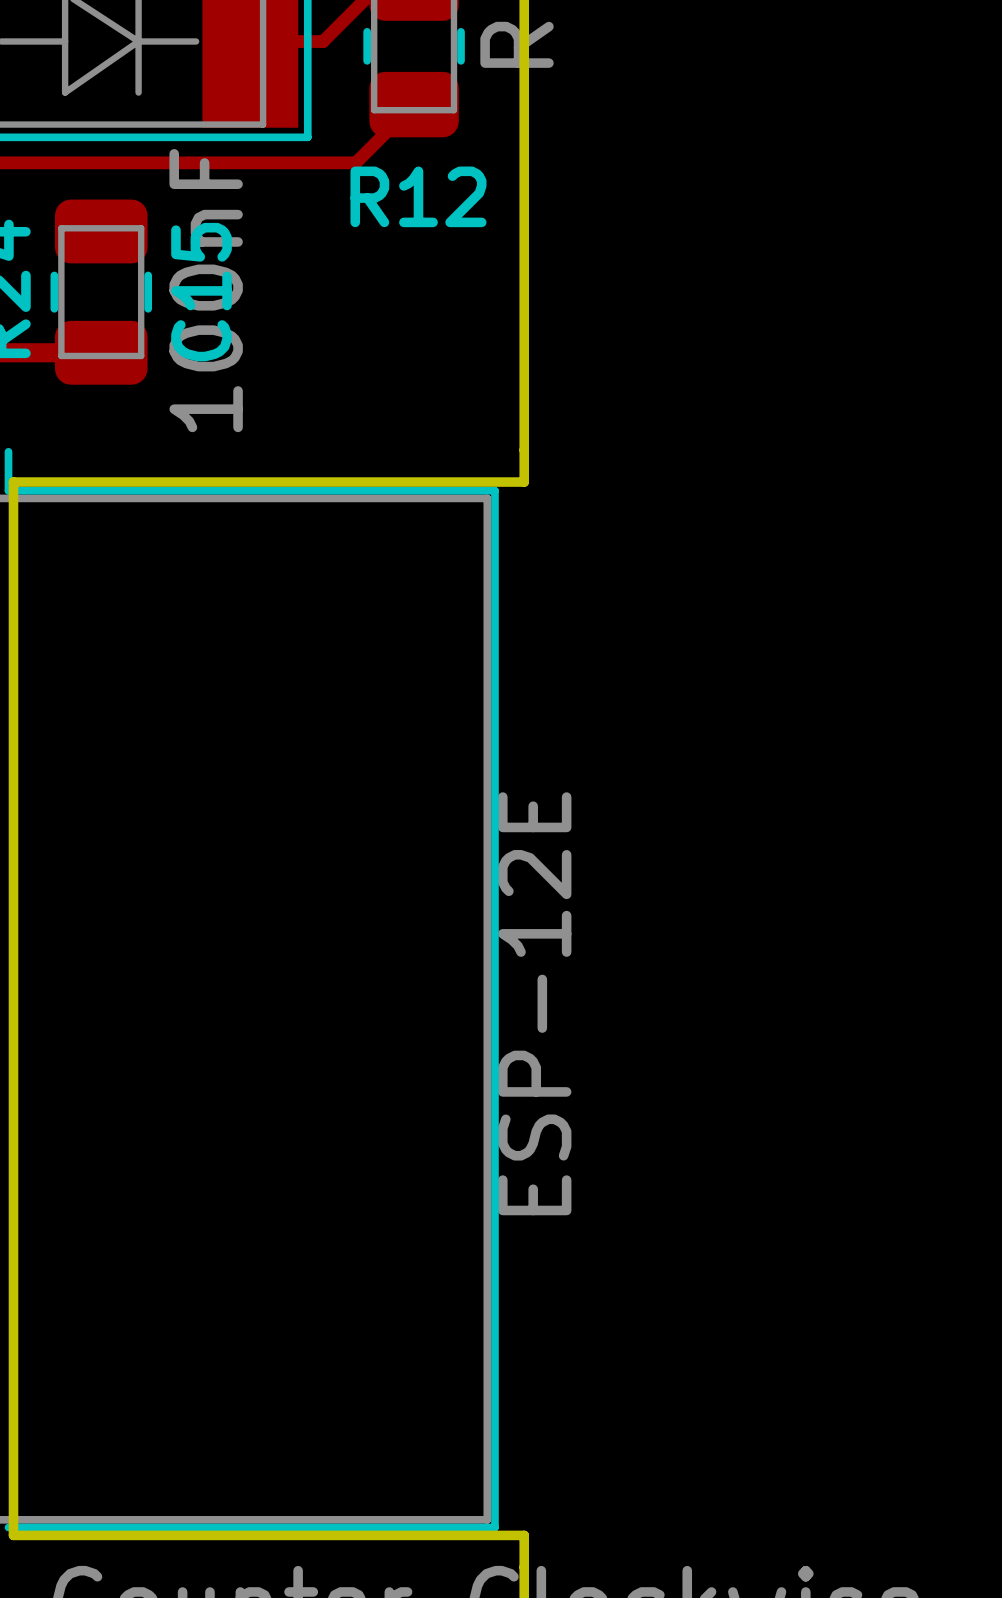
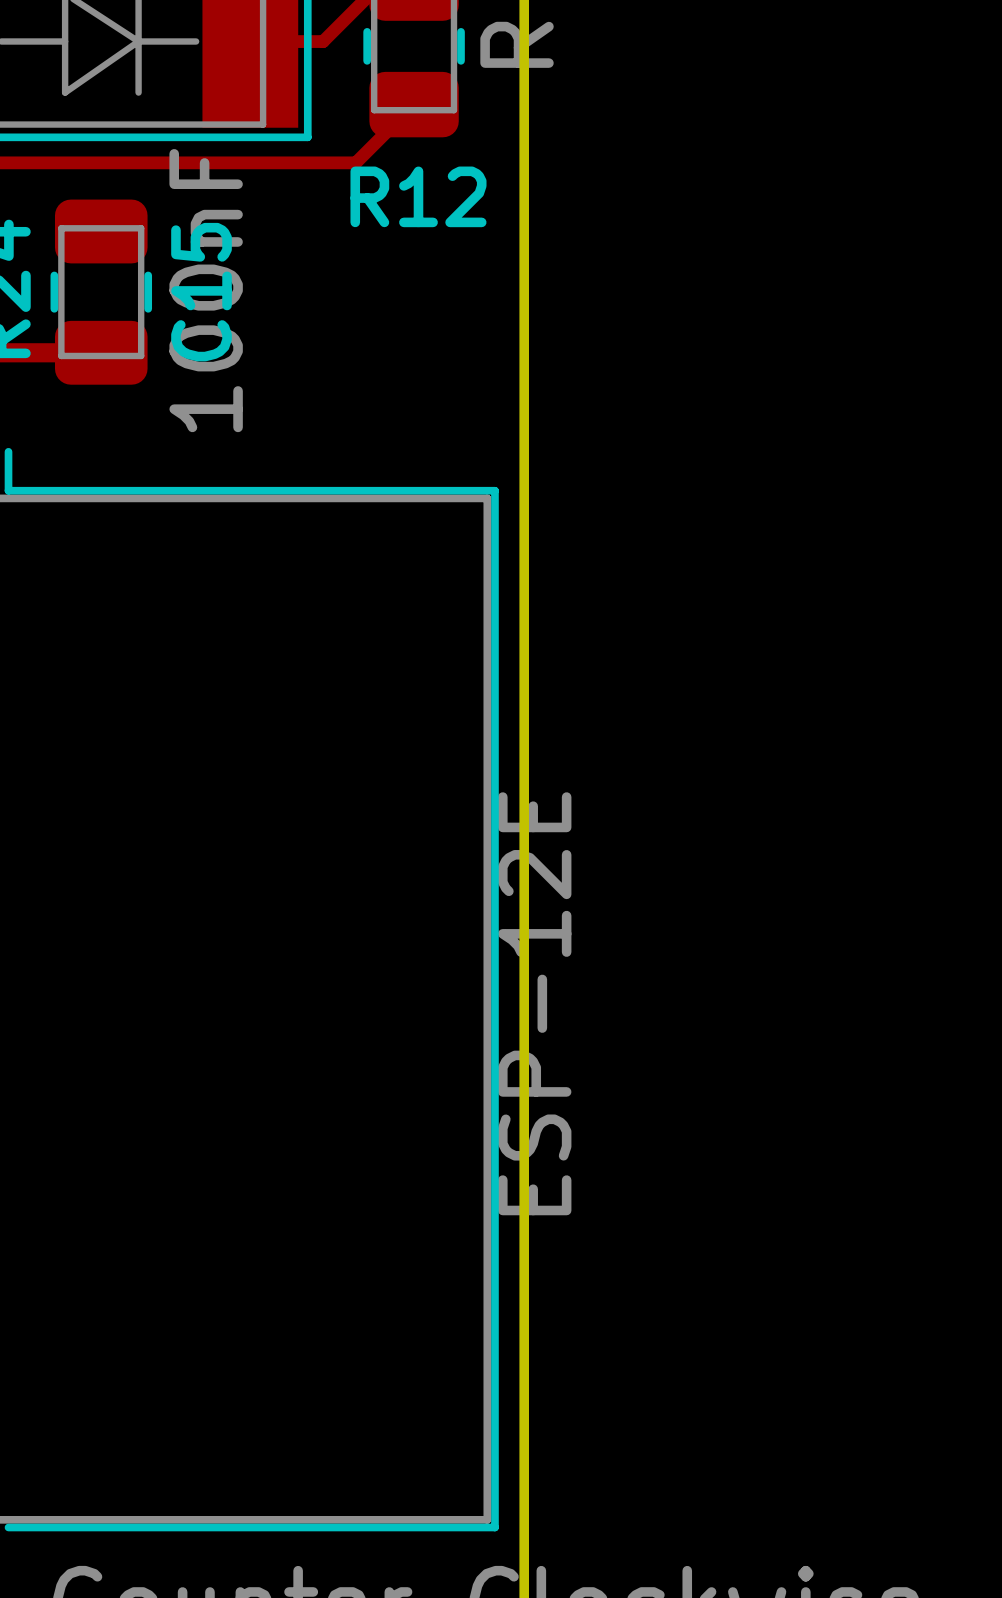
board edge: (524, 482) (13, 482) (13, 1535) (524, 1535) -> (524, 482) (524, 1535)

